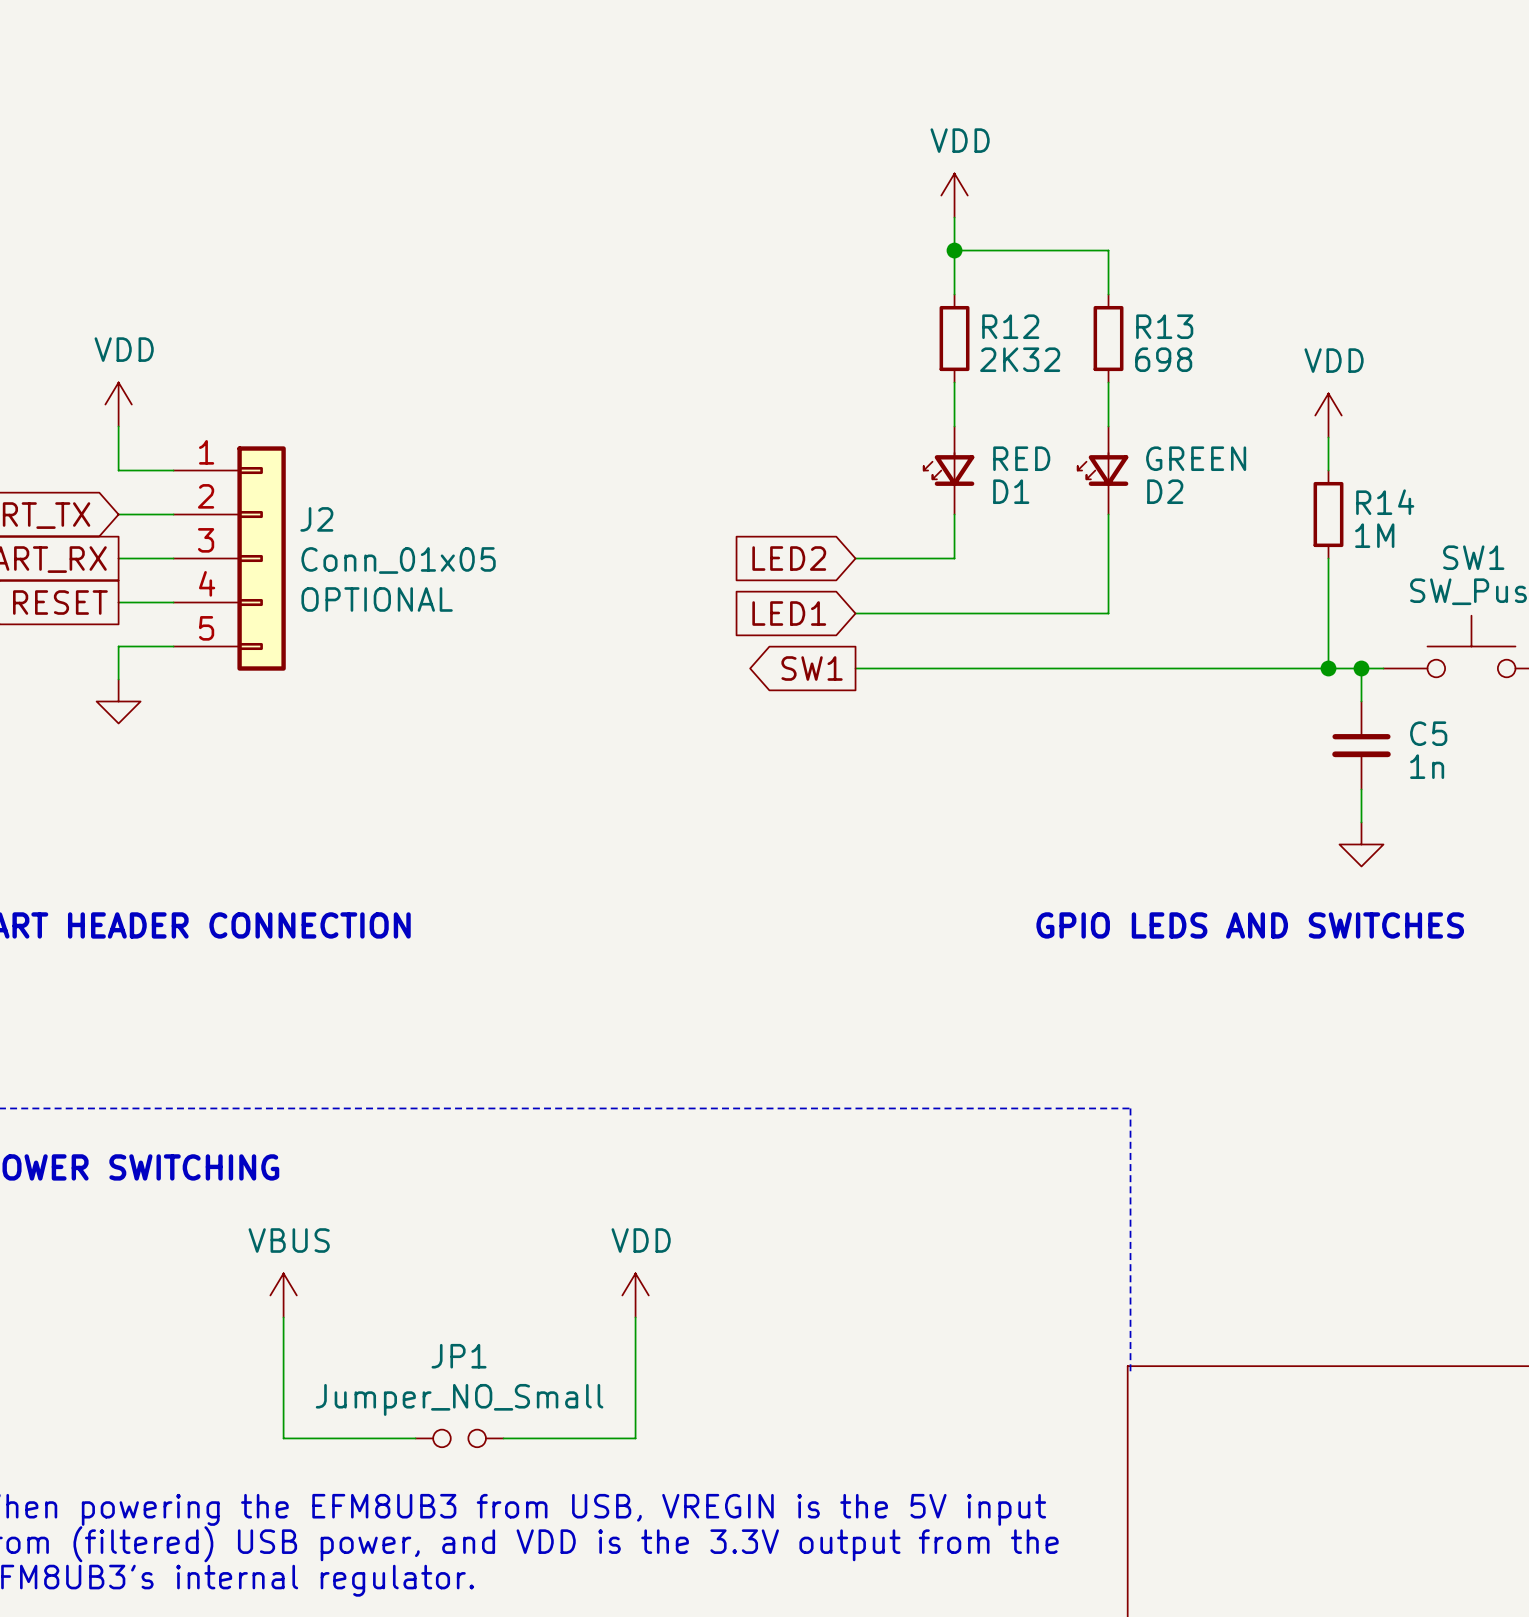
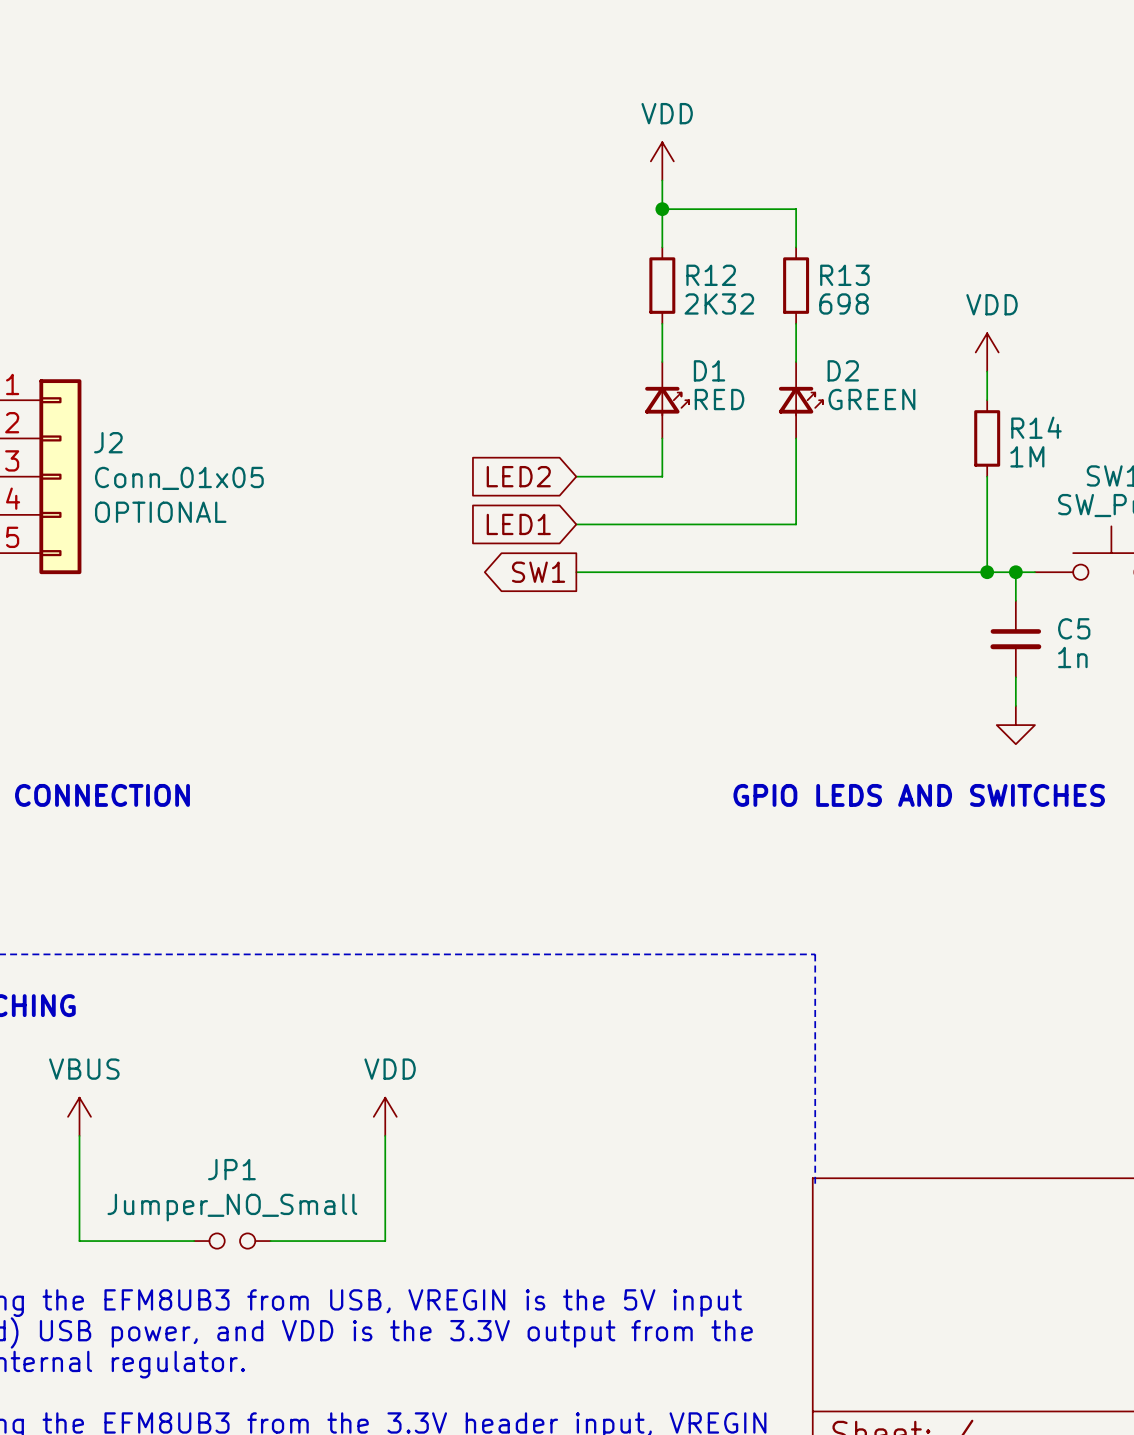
D1 rotation: 0° (949, 469) -> 180° (667, 401)
D2 rotation: 0° (1103, 469) -> 180° (800, 401)
D1 name position: D1 (1011, 491) -> D1 (709, 370)
D2 name position: D2 (1165, 491) -> D2 (843, 370)

